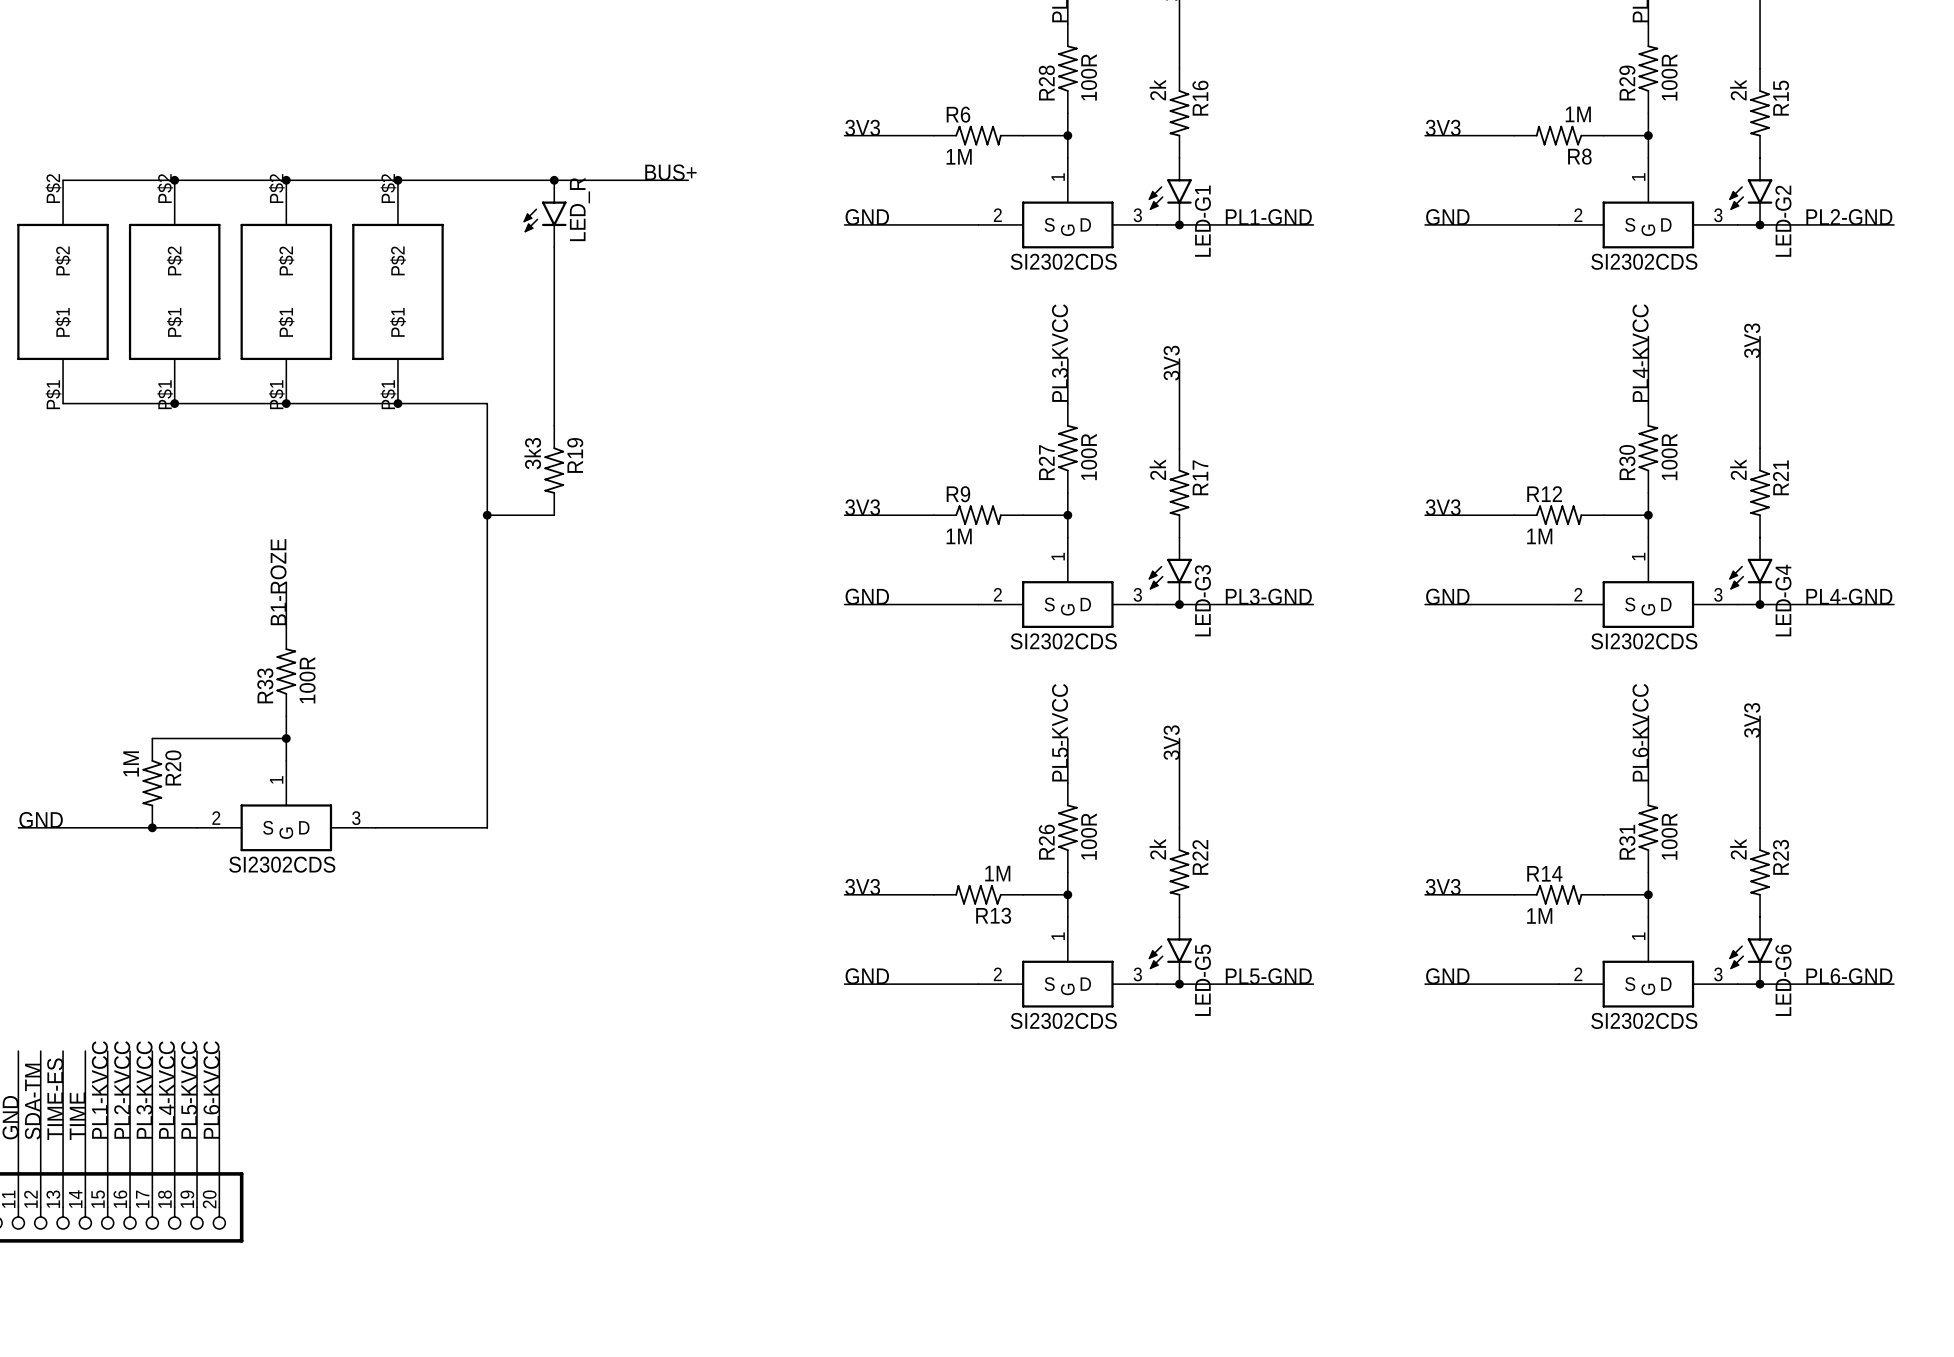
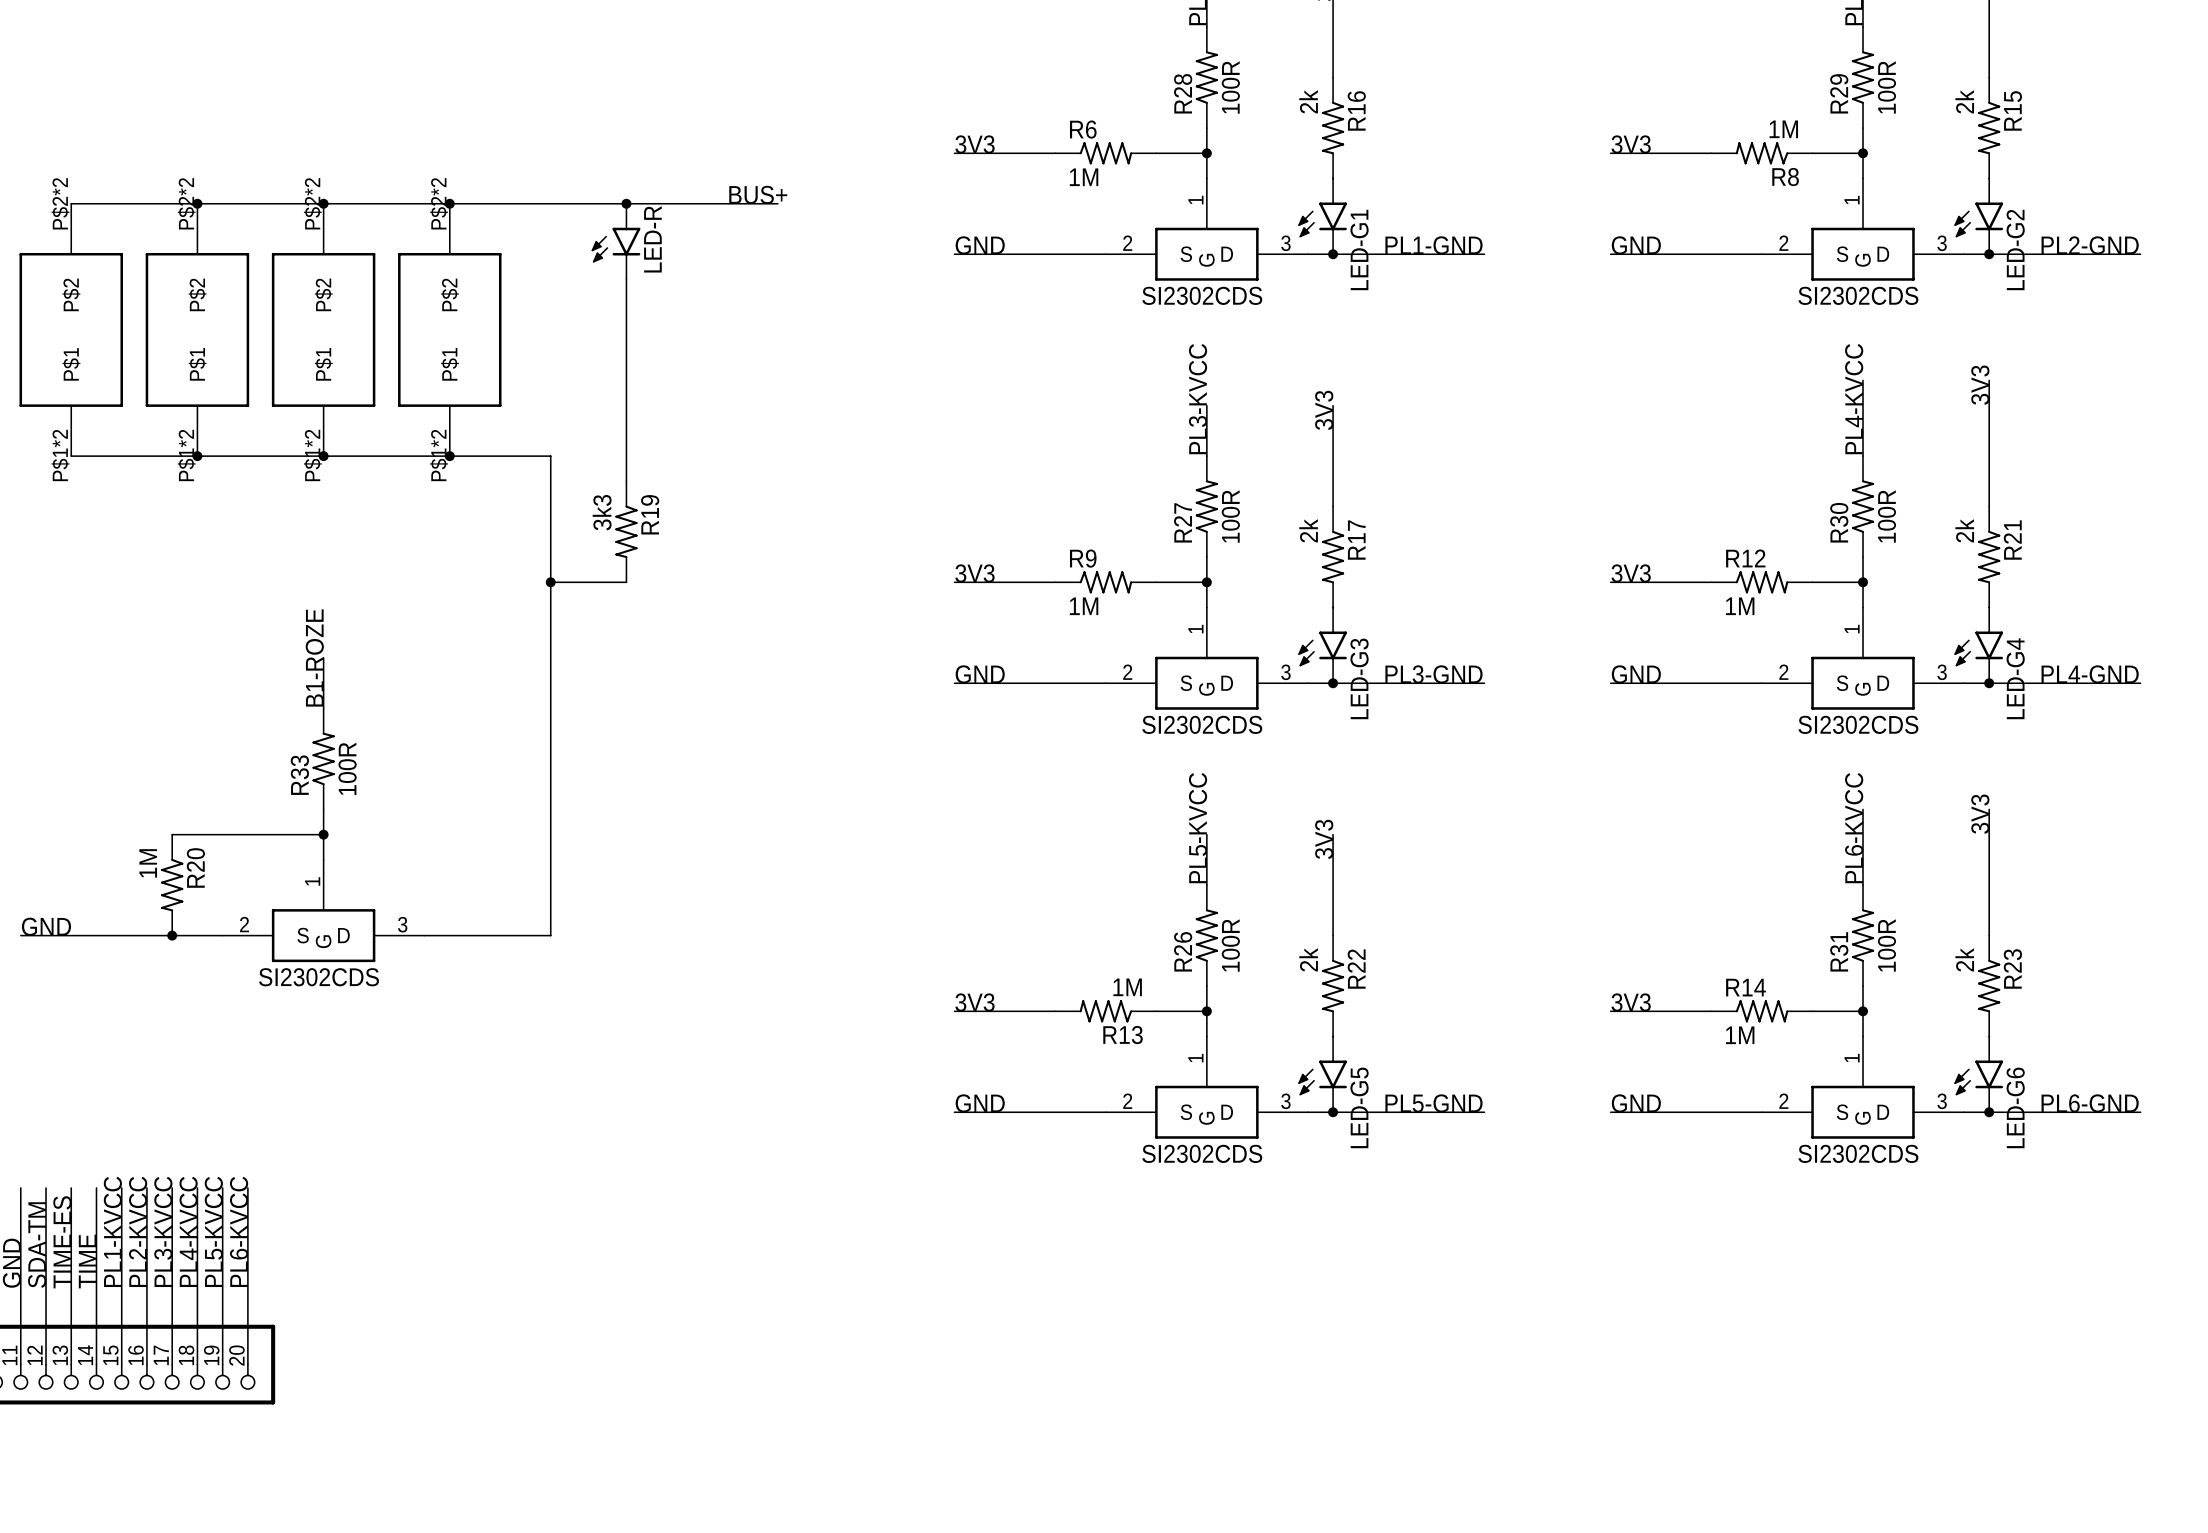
part pin number: P$2 (53, 188) -> P$2*2 (60, 203)
part pin number: P$2 (165, 188) -> P$2*2 (186, 203)
part pin number: P$2 (276, 188) -> P$2*2 (312, 203)
part pin number: P$2 (388, 188) -> P$2*2 (439, 203)
LED_R name: LED_R (579, 209) -> LED-R (652, 239)
part pin number: P$1 (53, 394) -> P$1*2 (60, 455)
part pin number: P$1 (165, 394) -> P$1*2 (186, 455)
part pin number: P$1 (276, 394) -> P$1*2 (312, 455)
part pin number: P$1 (388, 394) -> P$1*2 (439, 455)

